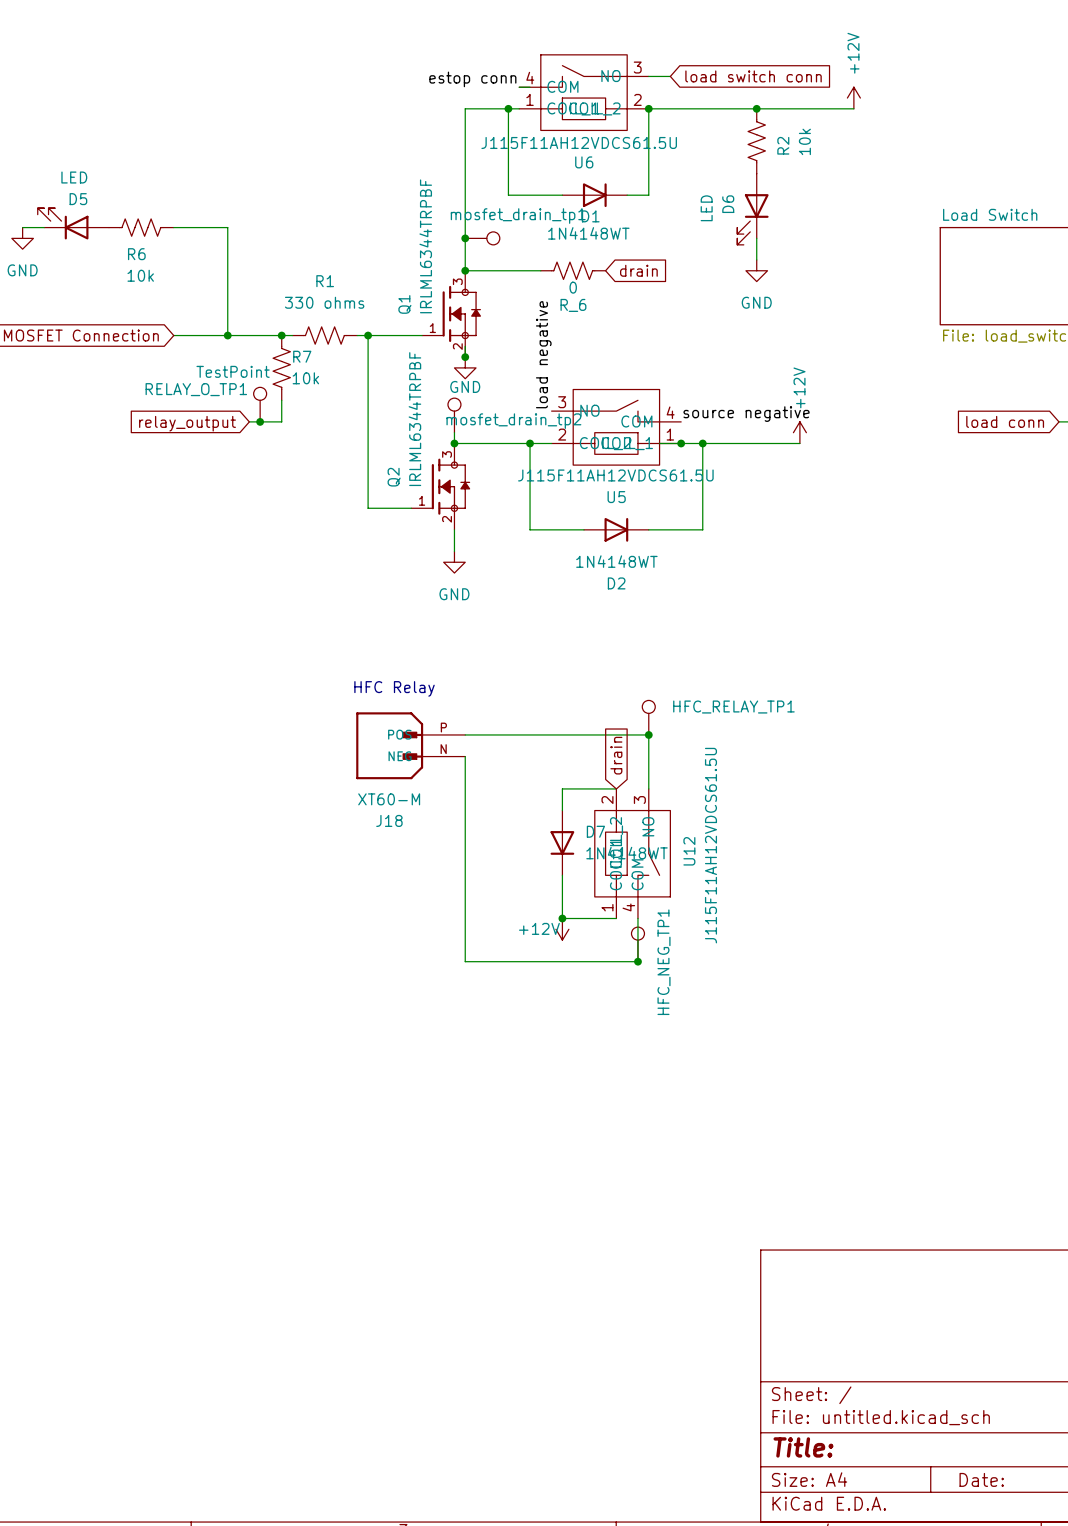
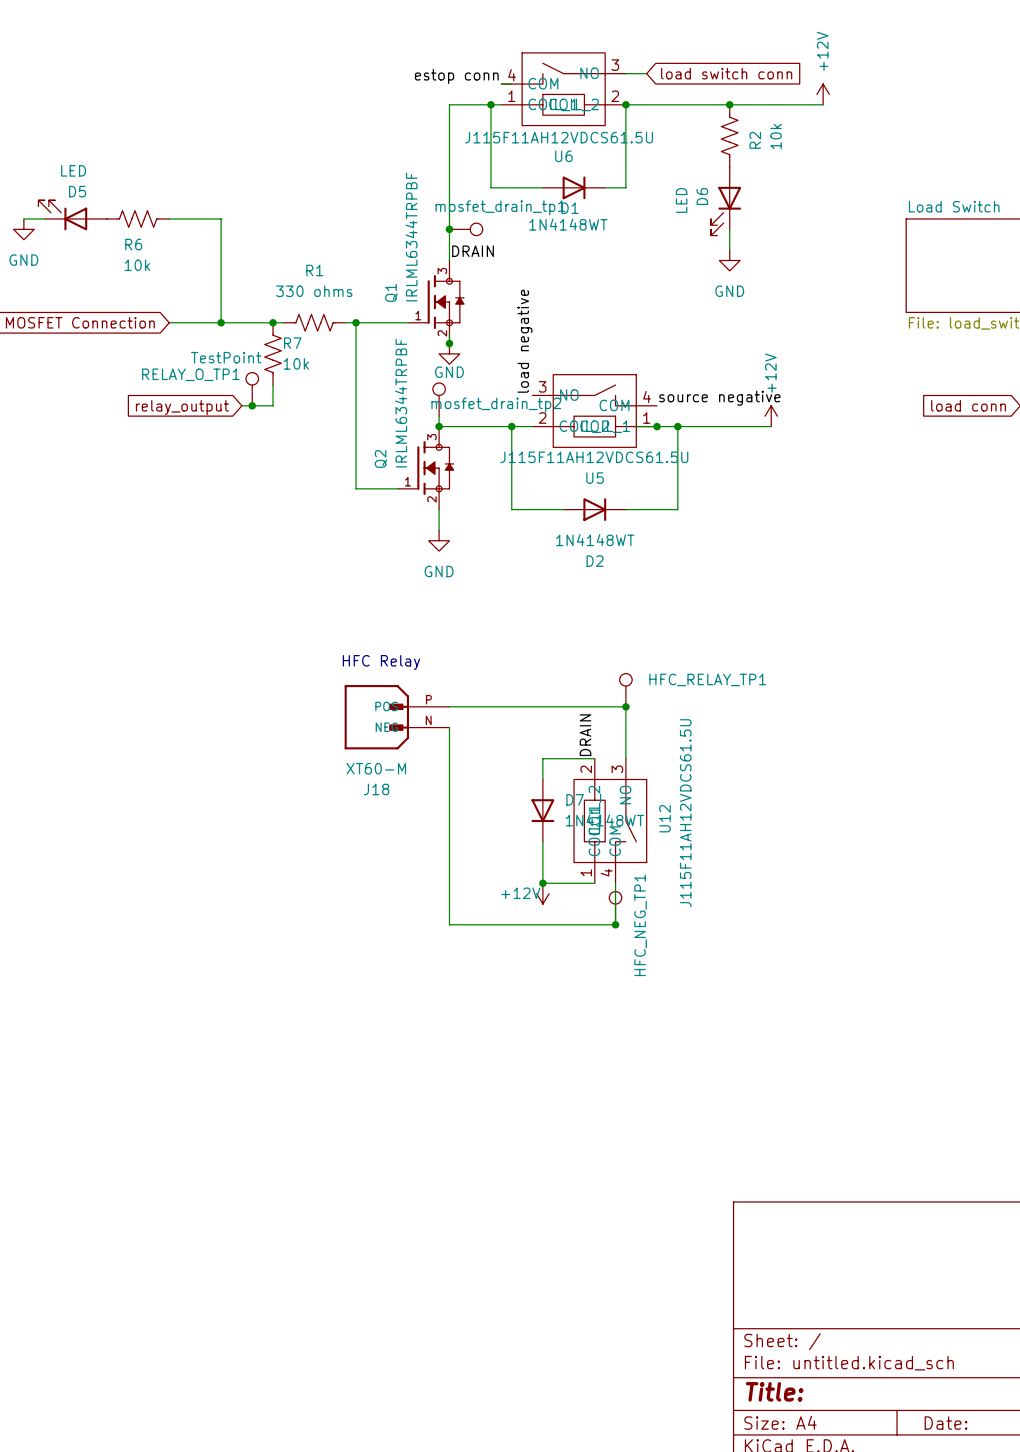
label: none -> DRAIN (473, 251)
wire: (465, 270) (540, 270) -> none
junction: (465, 270) -> none
R_6: 0 (573, 270) -> none
global label: drain (638, 270) -> none
global label: drain (616, 755) -> none
label: none -> DRAIN (585, 735)

